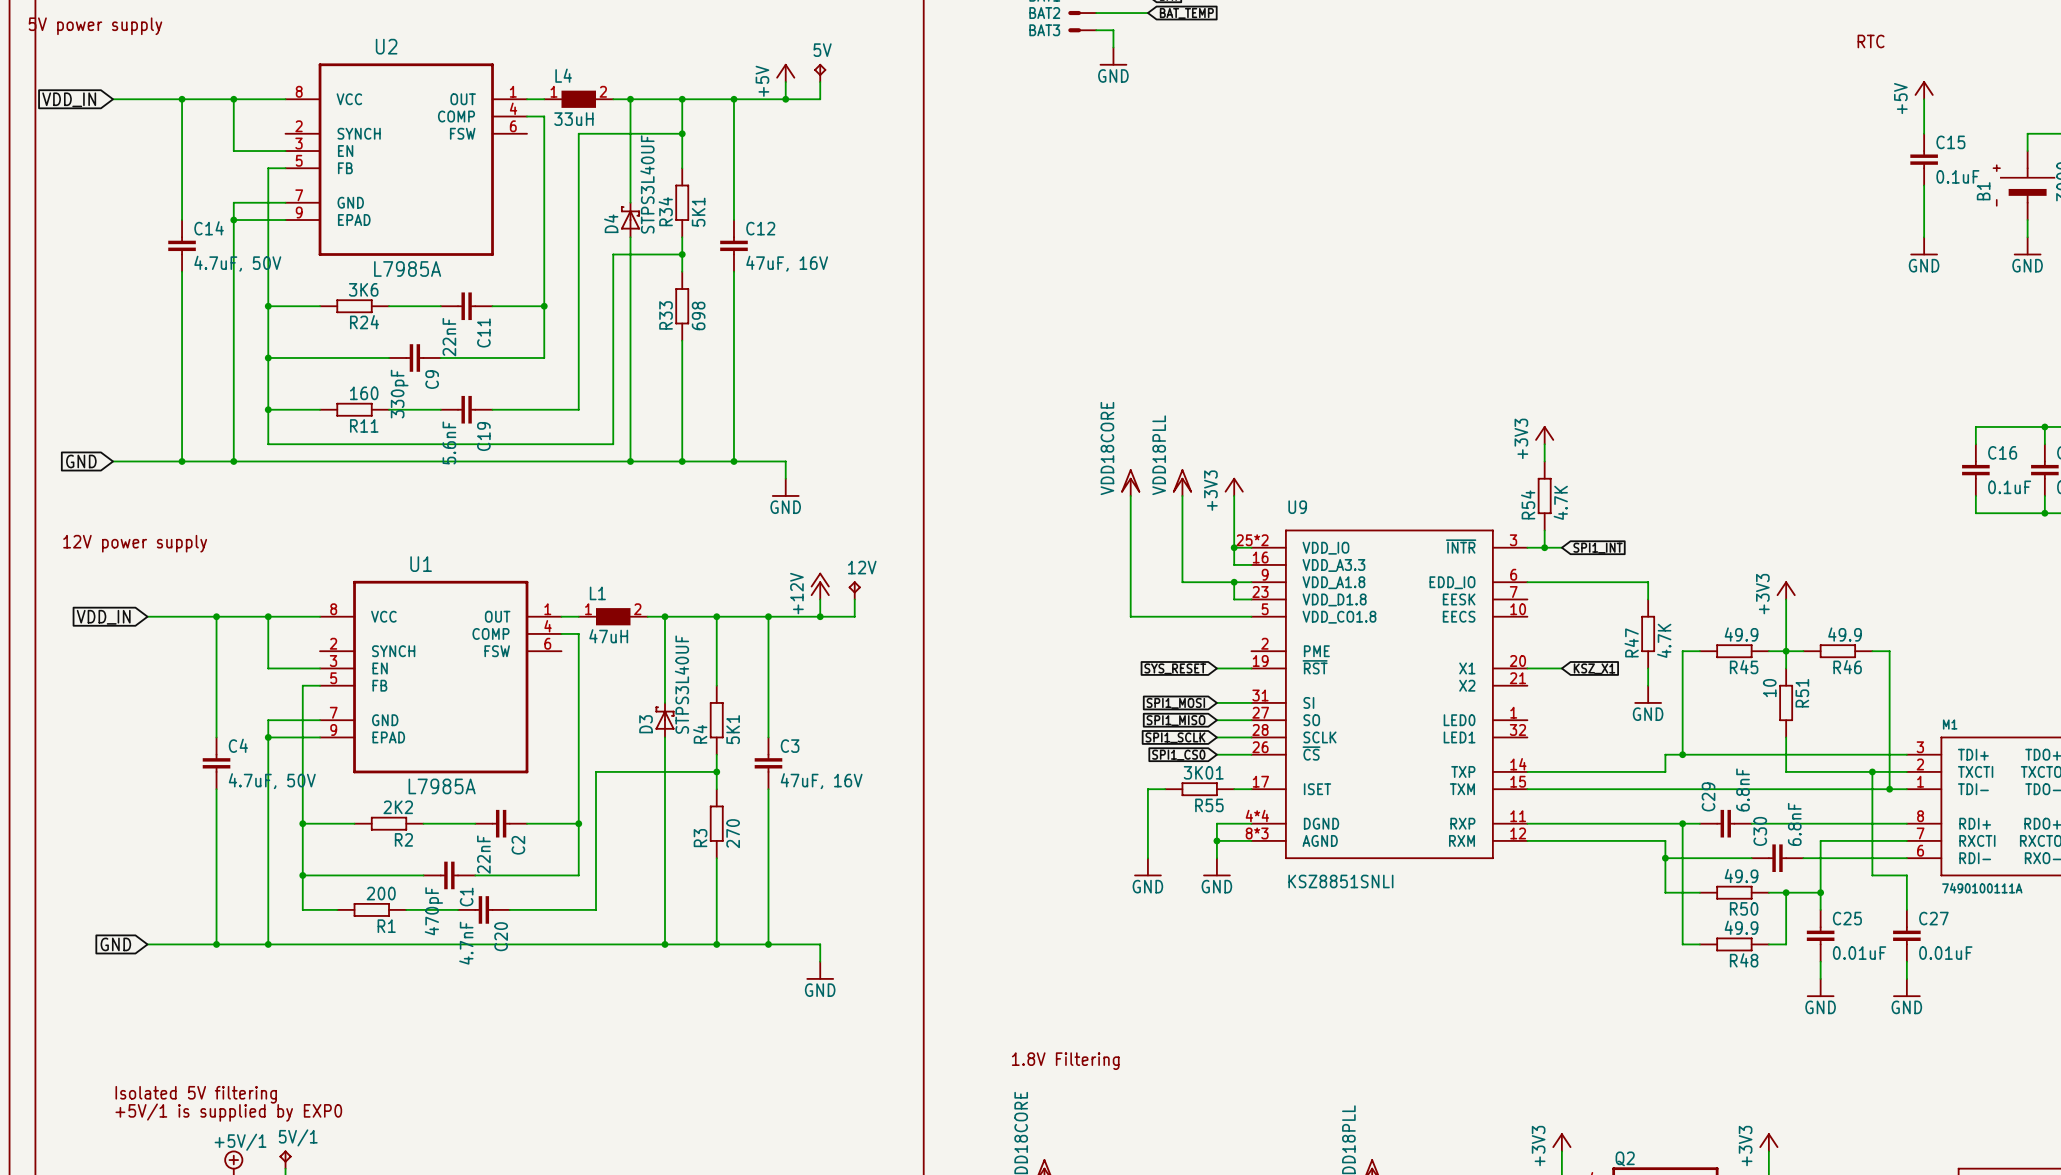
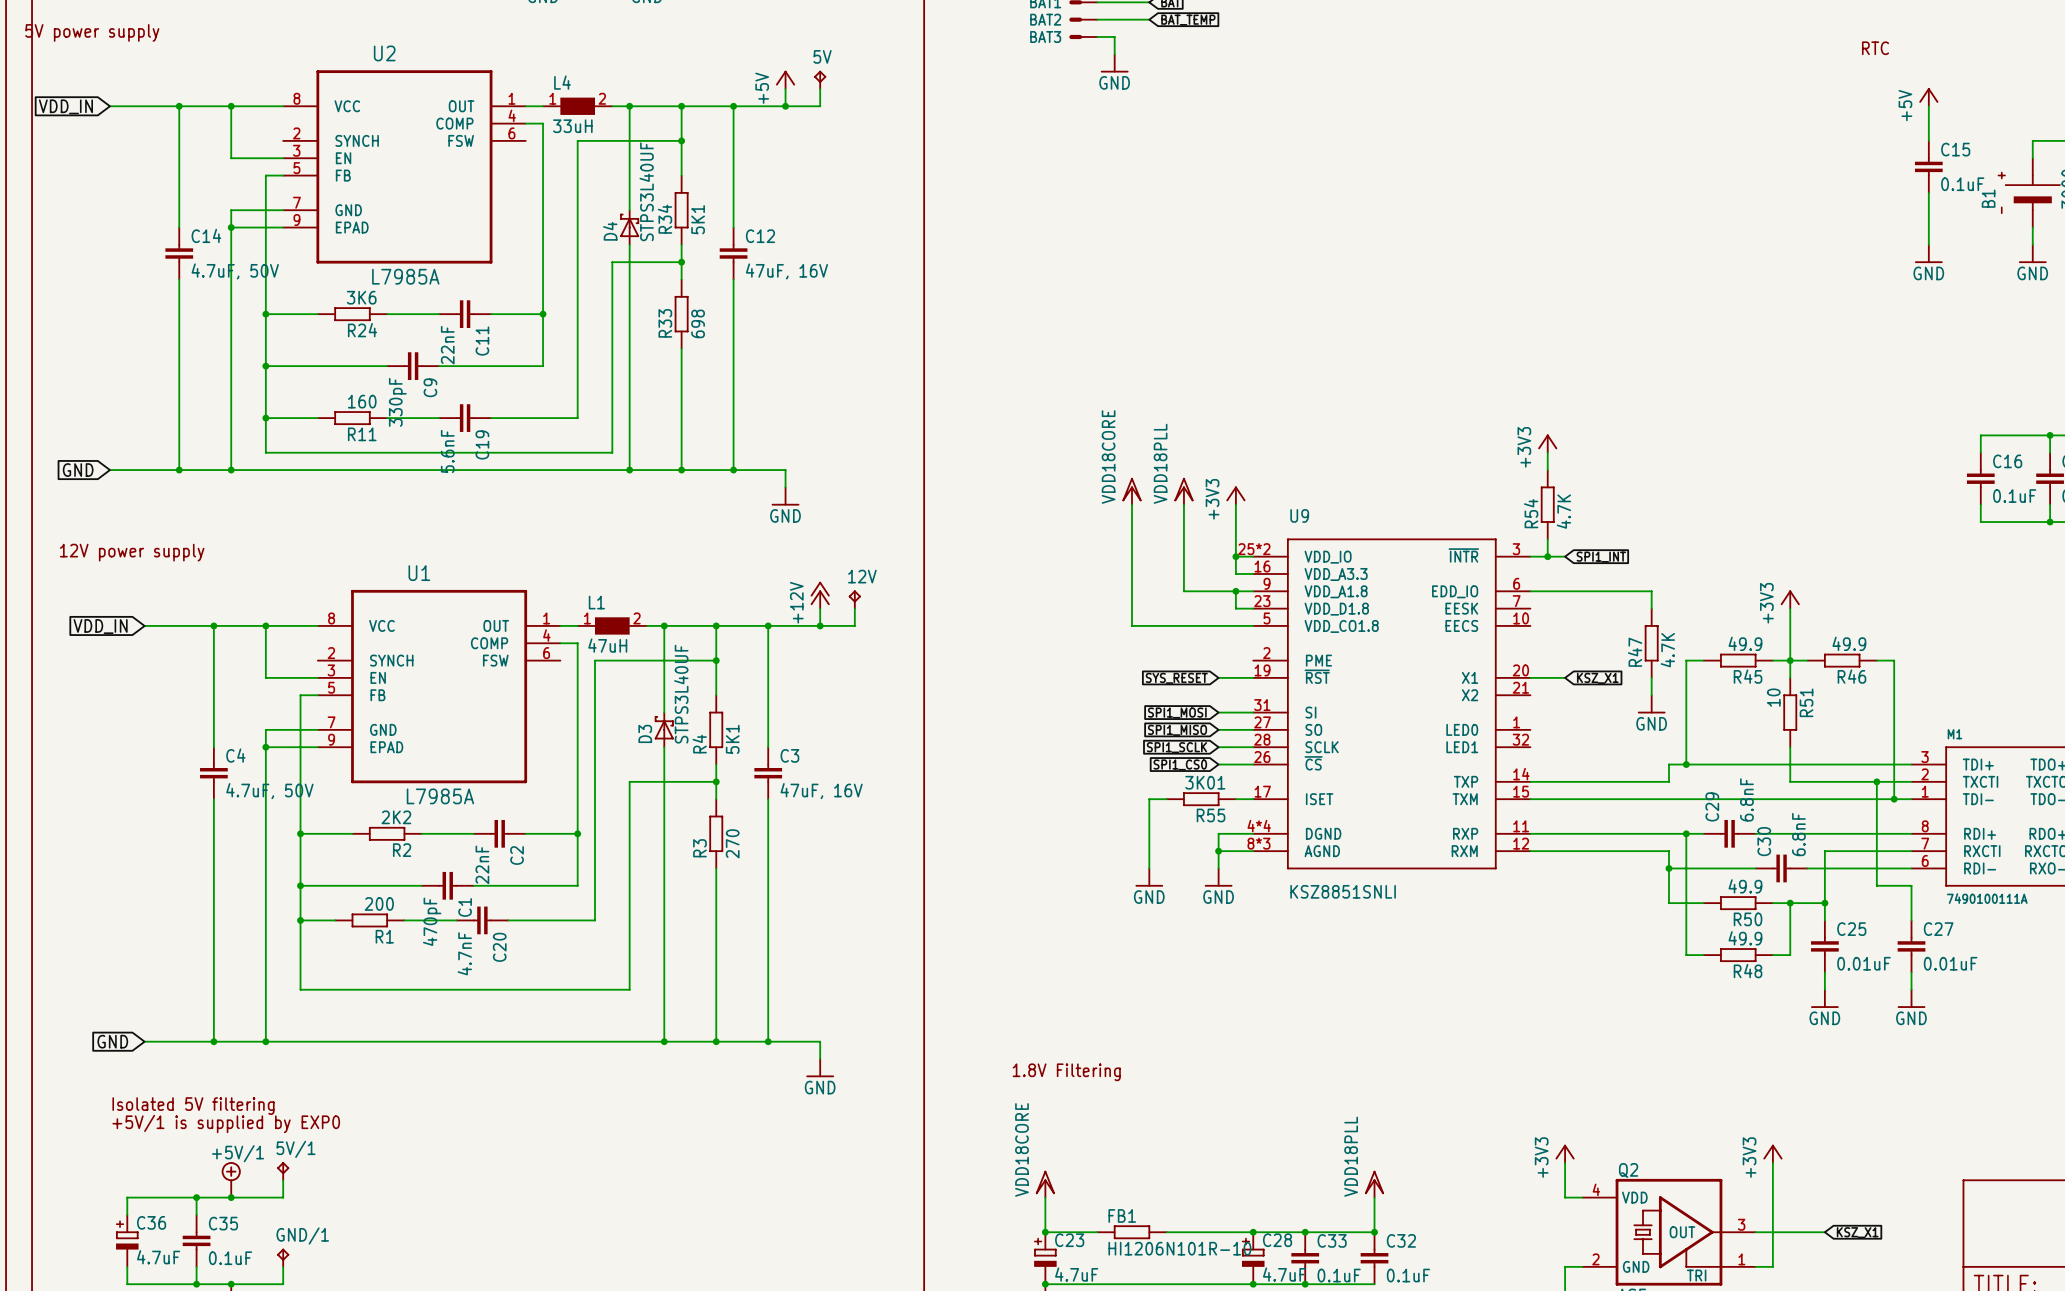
junction: none -> (716, 660)
wire: (596, 771) (630, 771) -> (595, 781) (595, 660) (716, 660)
wire: none -> (629, 781) (629, 989) (300, 989) (300, 920)
junction: none -> (300, 920)
global label position: GND (115, 944) -> GND (112, 1041)
wire: (147, 944) (820, 944) (820, 961) -> (144, 1041) (820, 1041) (820, 1059)
wire: none -> (213, 955) (213, 1041)
junction: (216, 944) -> none
wire: none -> (265, 955) (265, 1041)
junction: (268, 944) -> none
wire: none -> (664, 955) (664, 1041)
junction: (664, 944) -> none
wire: none -> (716, 955) (716, 1041)
junction: (716, 944) -> none
wire: none -> (768, 955) (768, 1041)
junction: (768, 944) -> none
power symbol position: GND (820, 970) -> GND (820, 1068)
junction: none -> (213, 1041)
junction: none -> (265, 1041)
junction: none -> (664, 1041)
junction: none -> (716, 1041)
junction: none -> (768, 1041)

